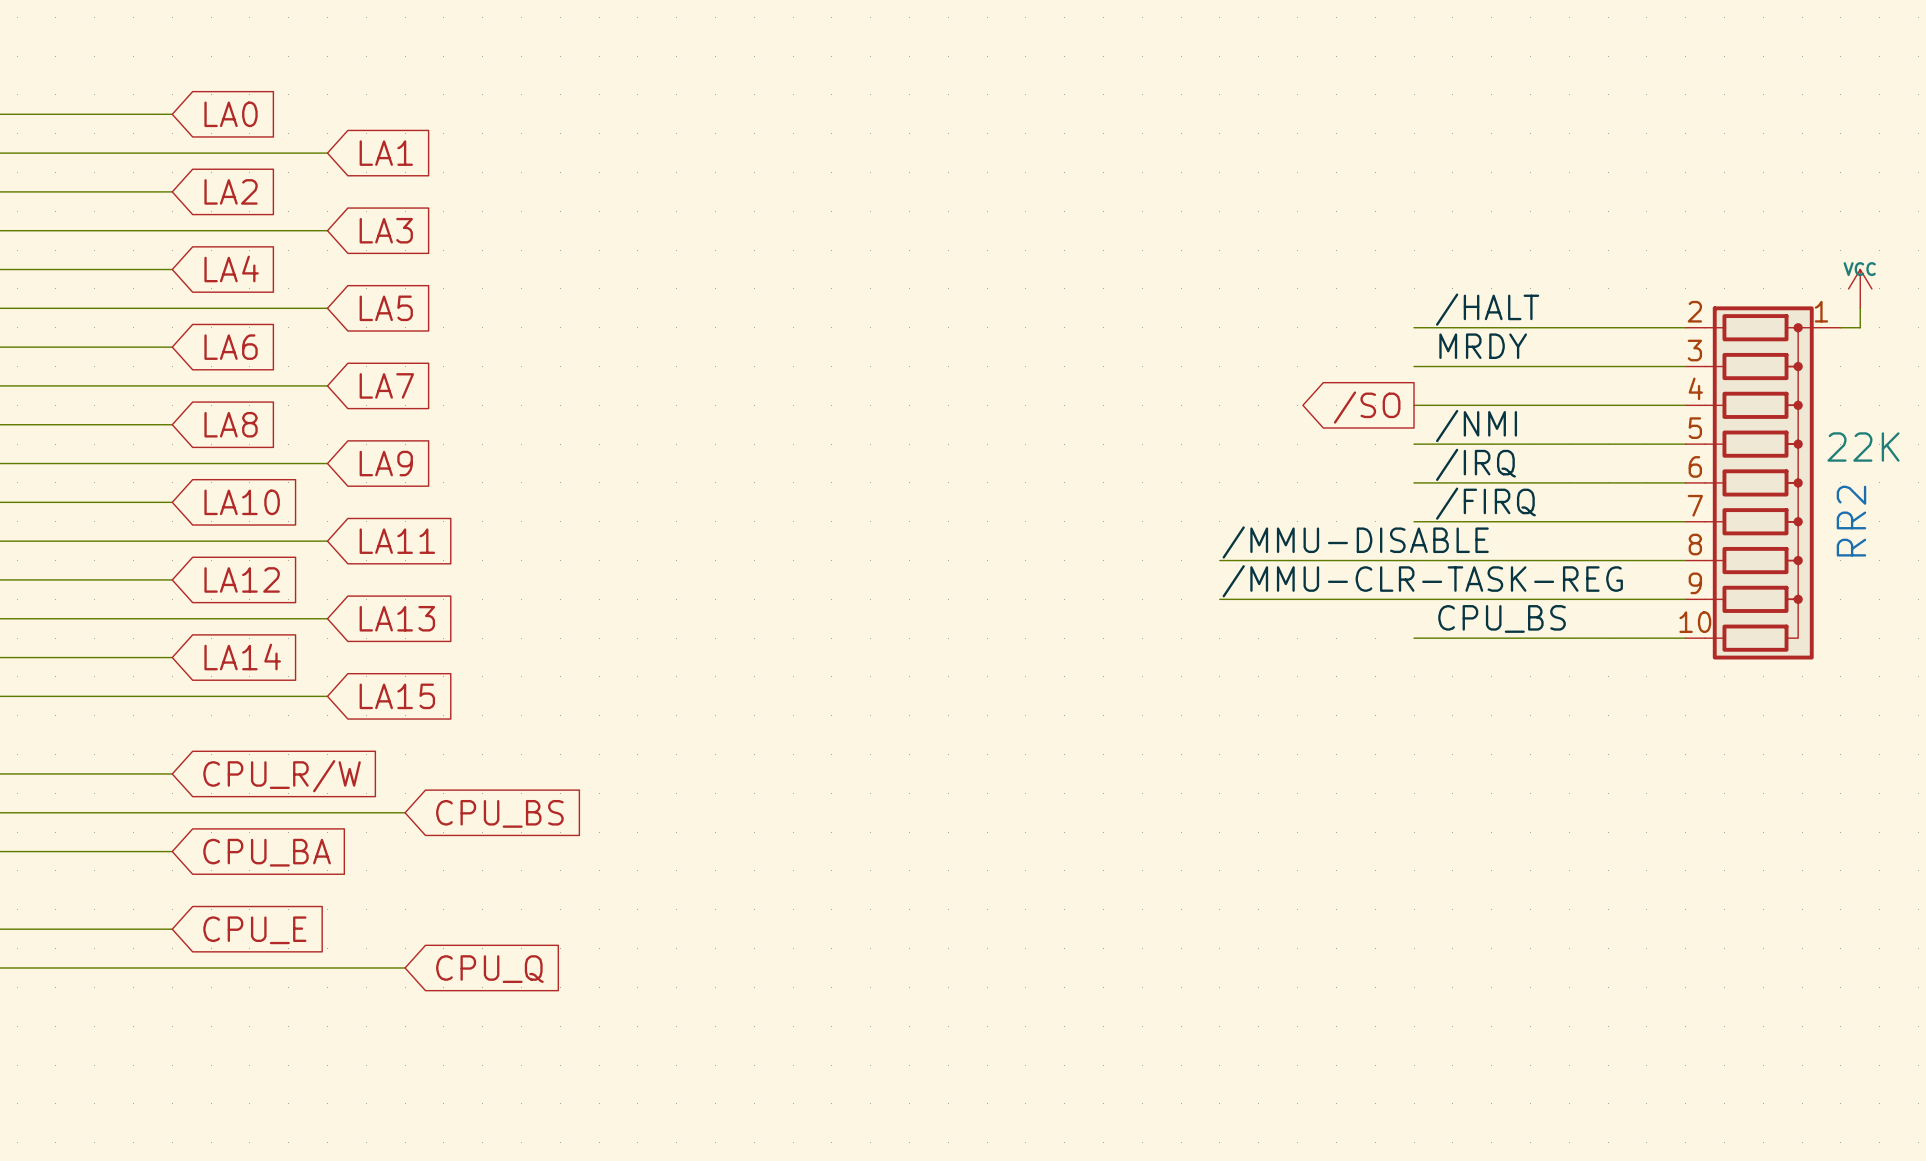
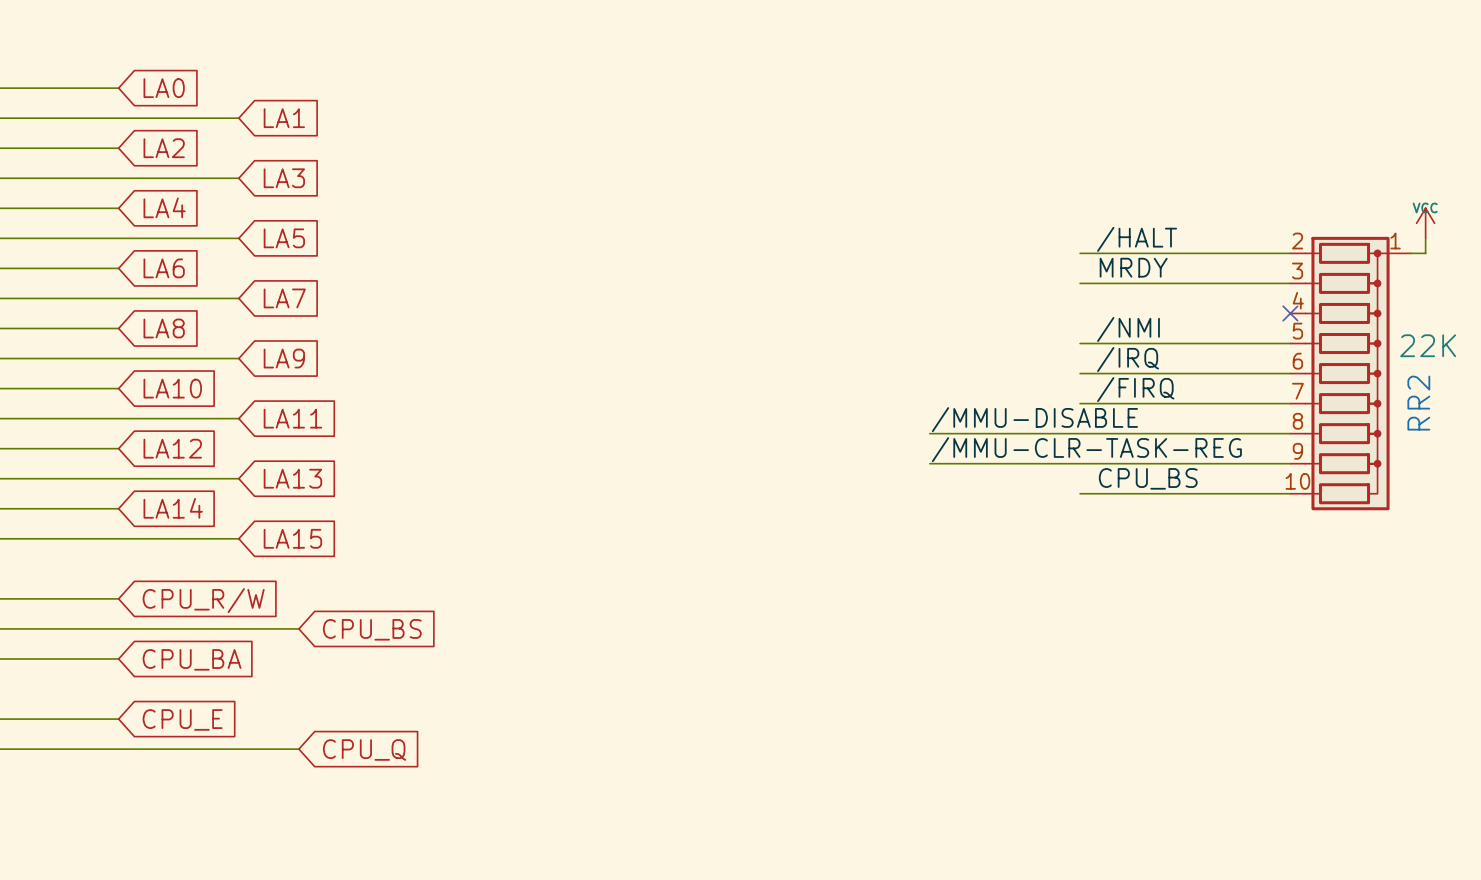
wire: (1414, 405) (1685, 405) -> none
no-connect mark: none -> (1290, 313)
global label: /SO (1367, 407) -> none

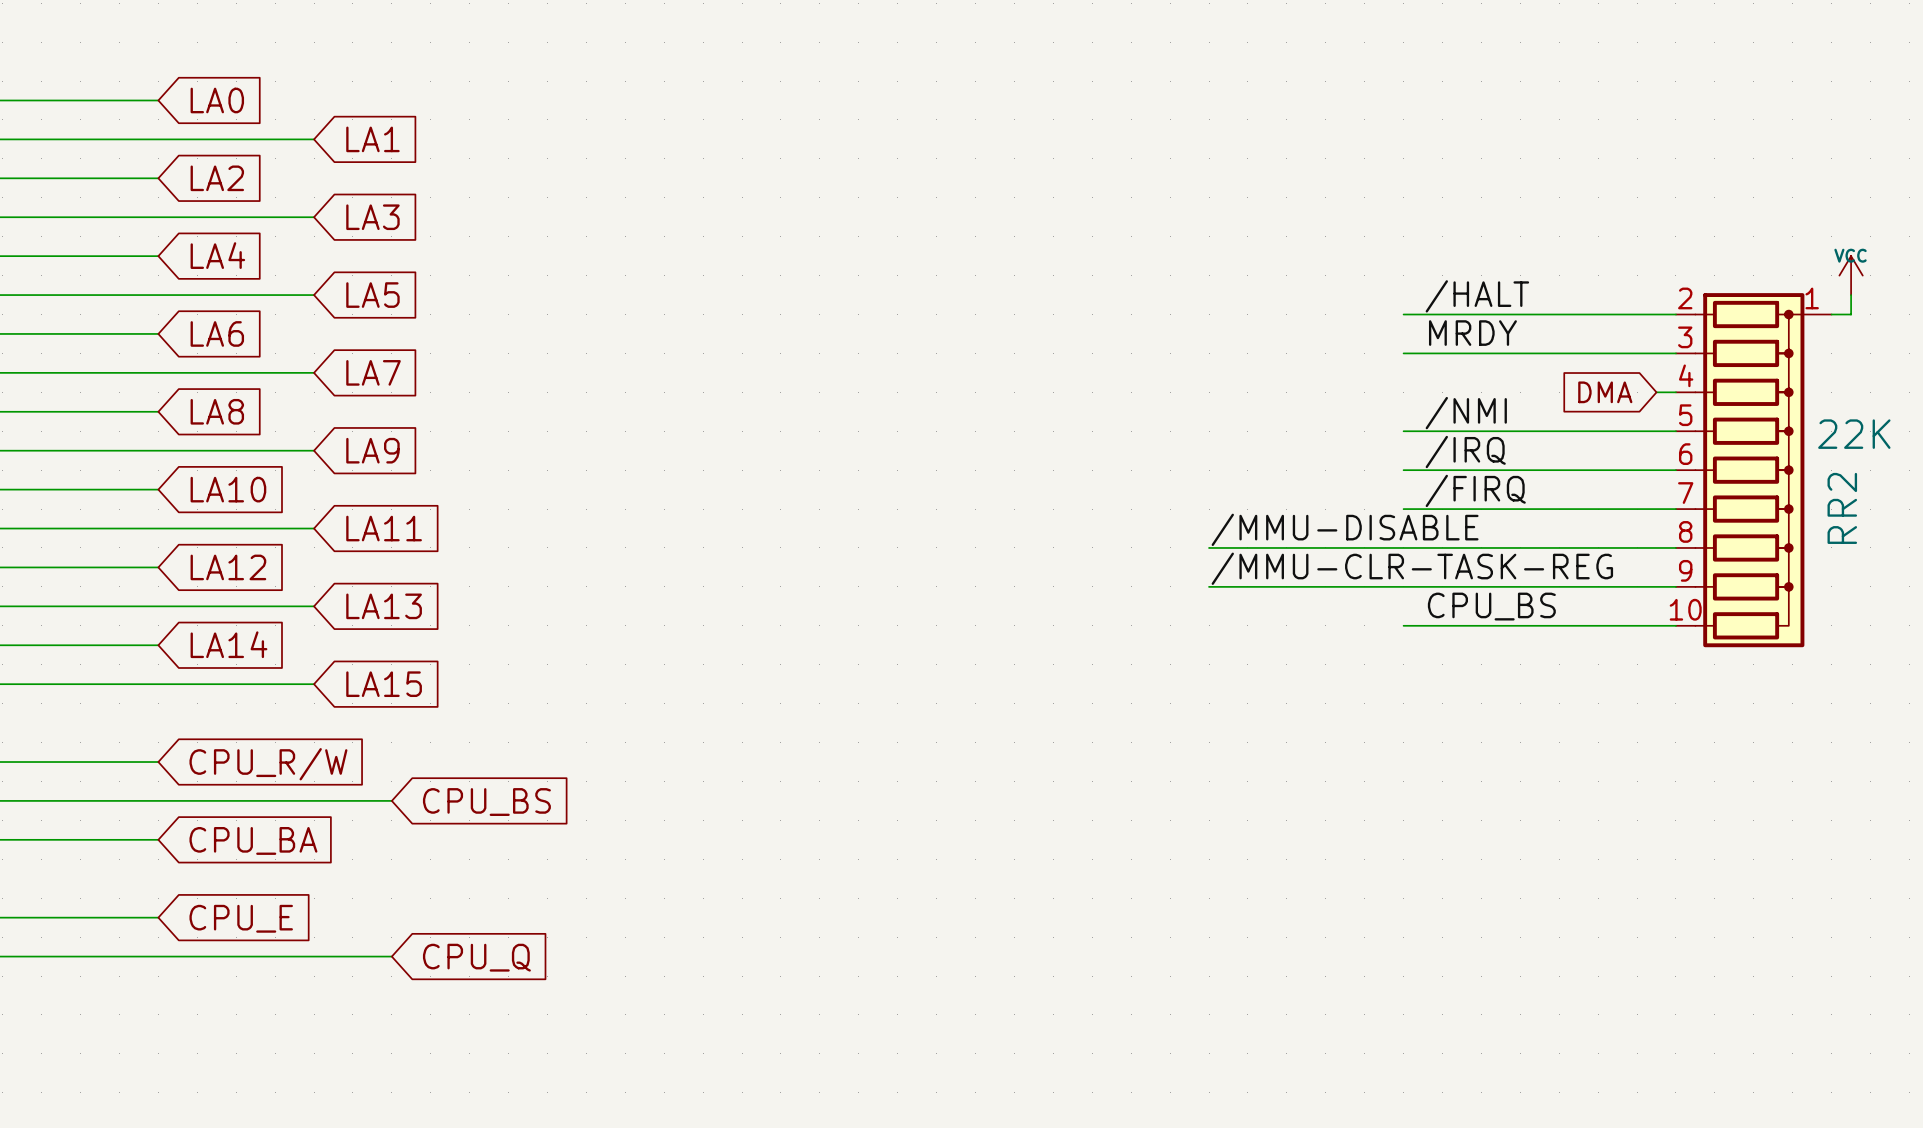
global label: none -> DMA (1605, 392)
wire: none -> (1656, 392) (1675, 392)
no-connect mark: (1290, 313) -> none

